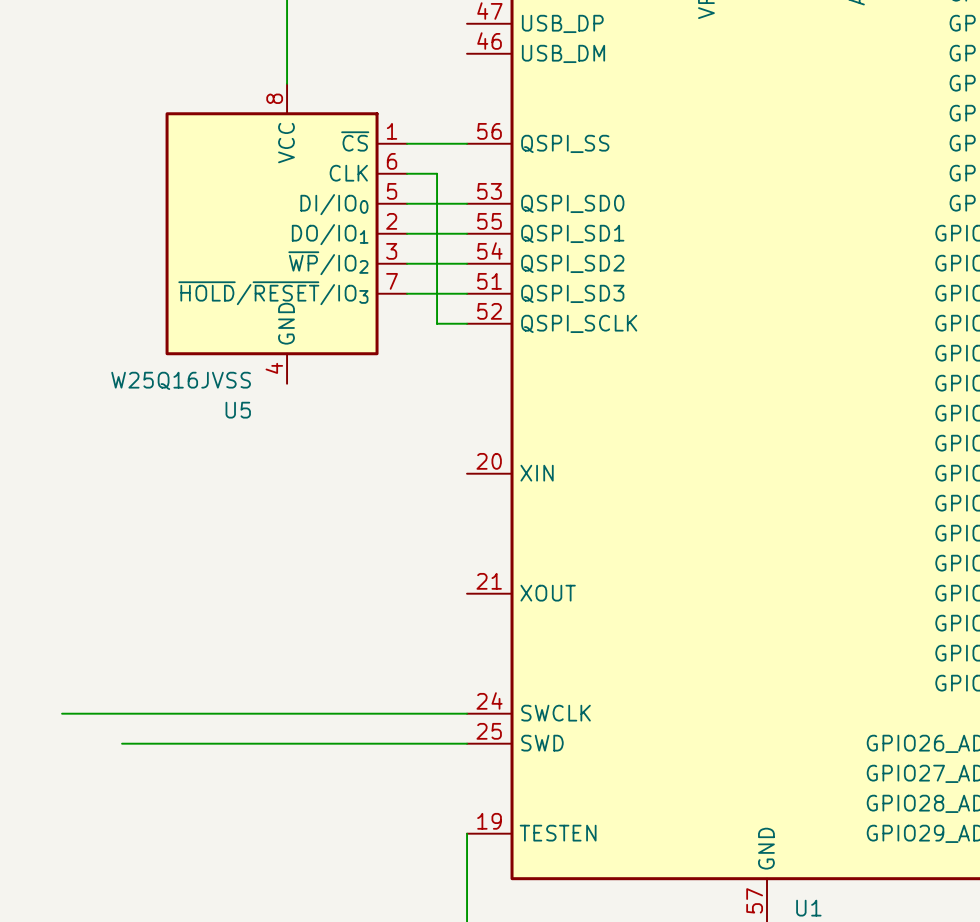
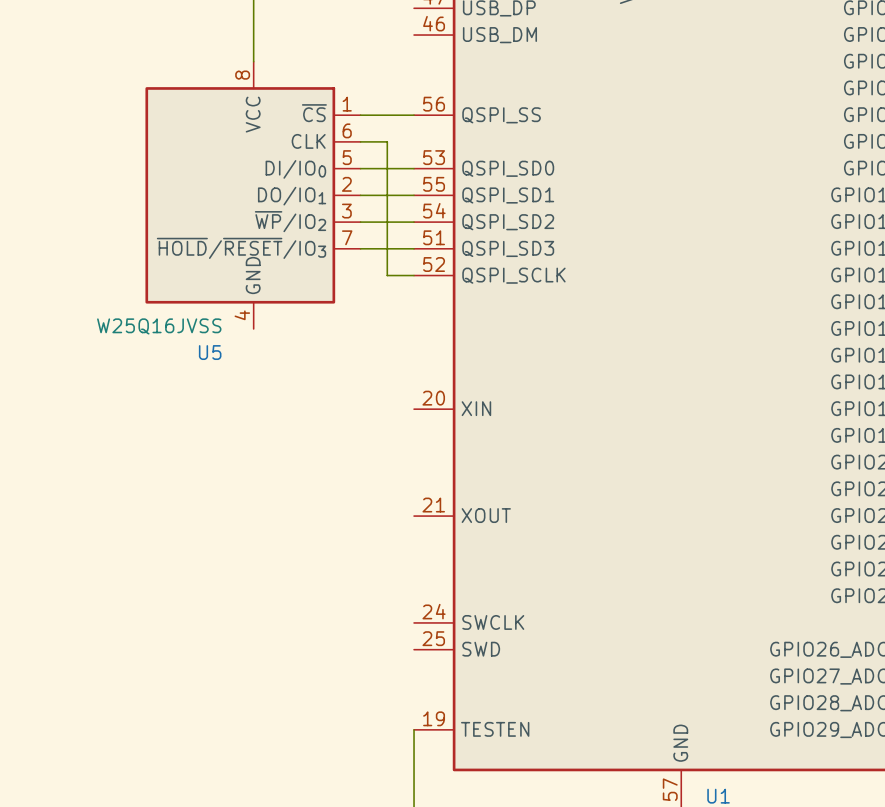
wire: (62, 713) (467, 713) -> none
wire: (122, 743) (467, 743) -> none

